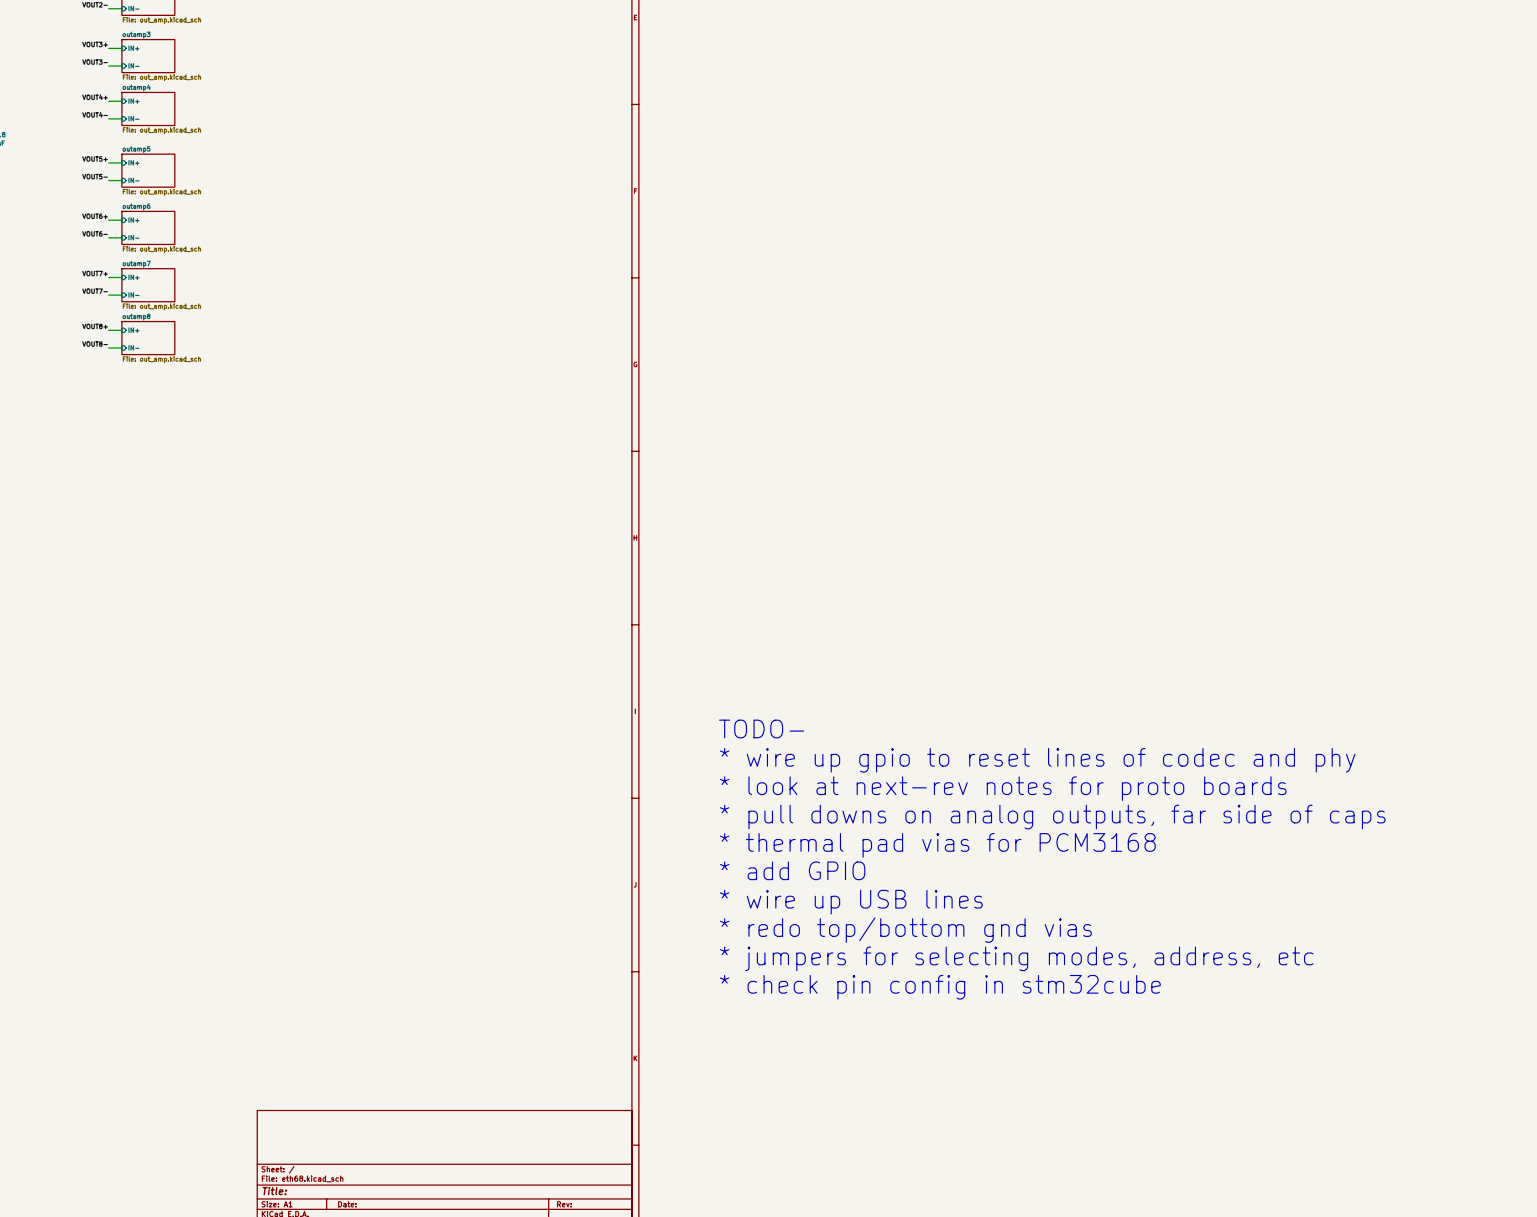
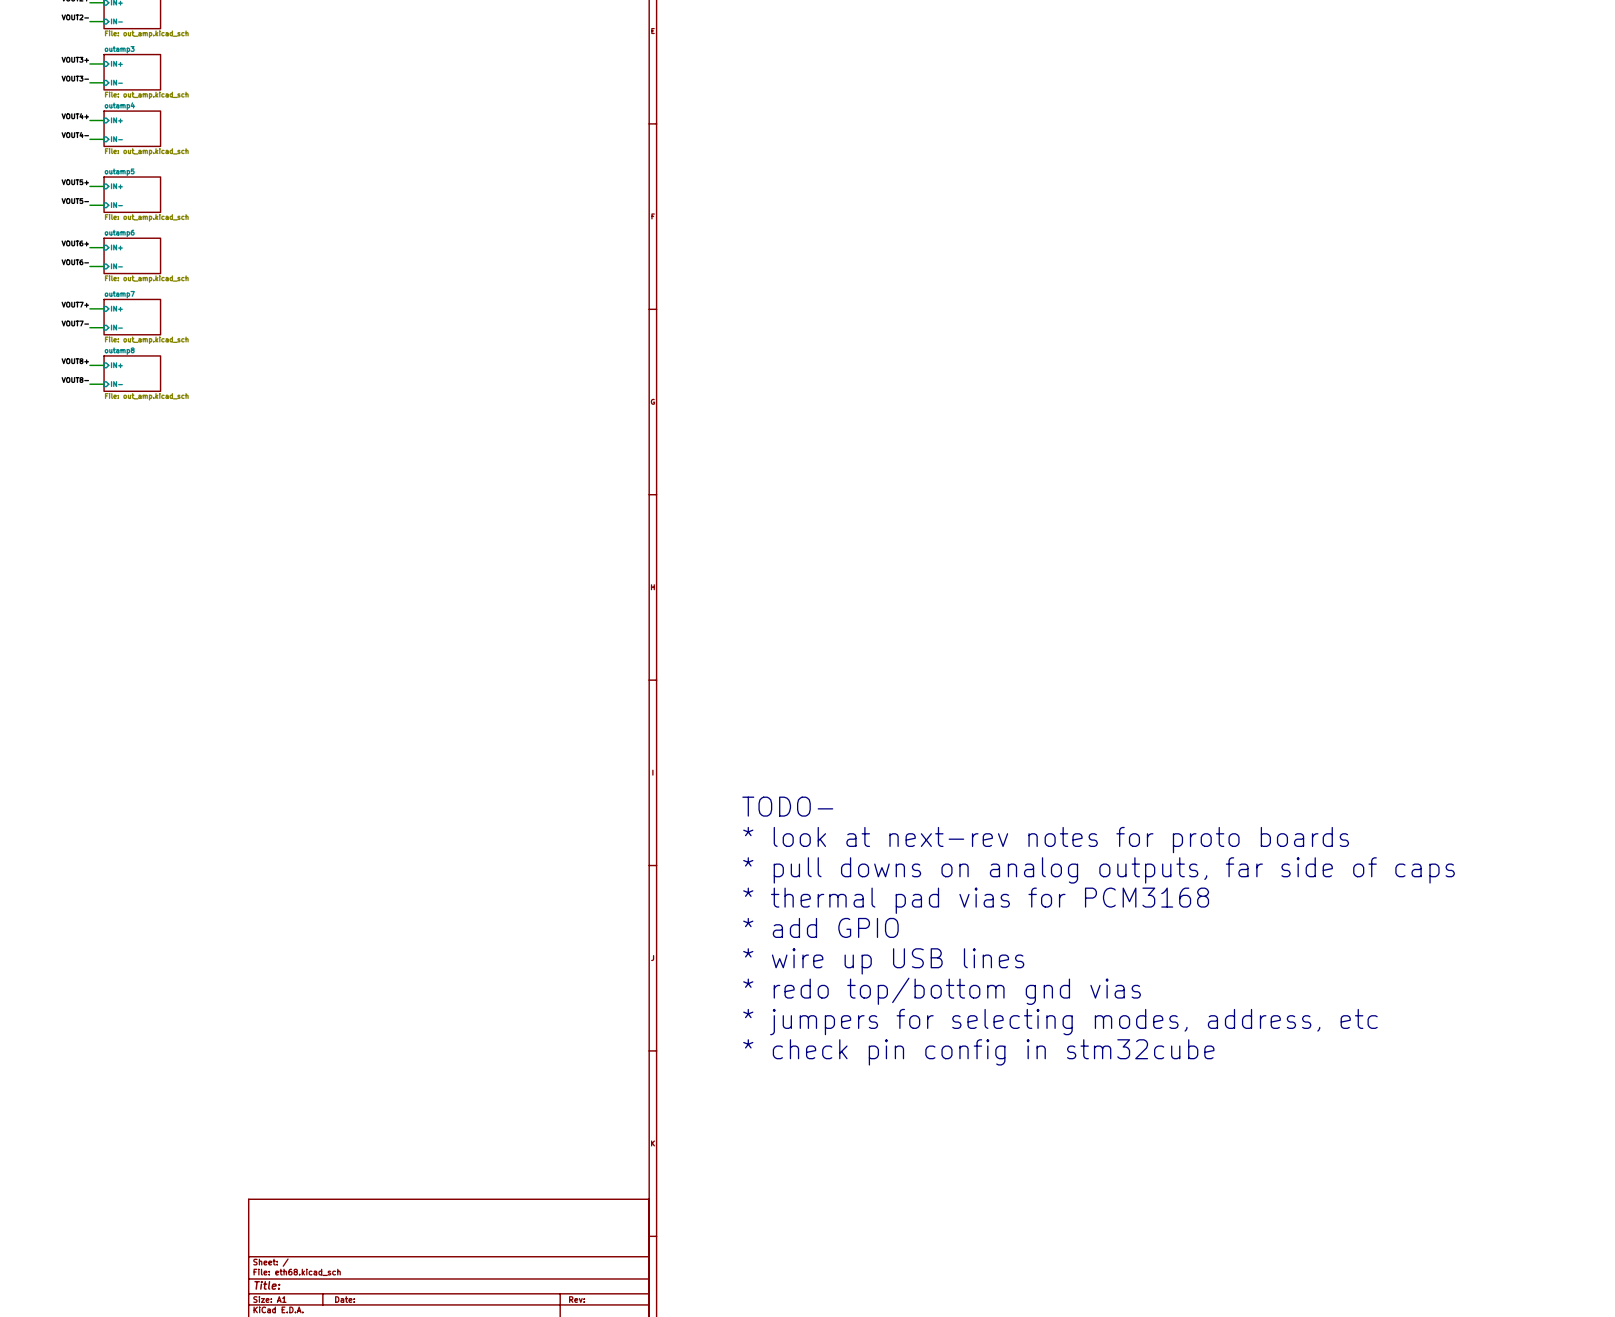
text position: TODO- (761, 728) -> TODO- (787, 806)
text: * wire up gpio to reset lines of codec and phy (1037, 760) -> none
text position: * look at next-rev notes for proto boards (1003, 788) -> * look at next-rev notes for proto boards (1046, 840)
text position: * pull downs on analog outputs, far side of caps (1052, 817) -> * pull downs on analog outputs, far side of caps (1099, 870)
text position: * thermal pad vias for PCM3168 (937, 845) -> * thermal pad vias for PCM3168 (976, 900)
text position: * add GPIO (792, 870) -> * add GPIO (820, 927)
text position: * wire up USB lines (851, 902) -> * wire up USB lines (883, 961)
text position: * redo top/bottom gnd vias (905, 930) -> * redo top/bottom gnd vias (942, 991)
text position: * jumpers for selecting modes, address, etc (1016, 958) -> * jumpers for selecting modes, address, etc (1060, 1022)
text position: * check pin config in stm32cube (940, 987) -> * check pin config in stm32cube (978, 1052)

